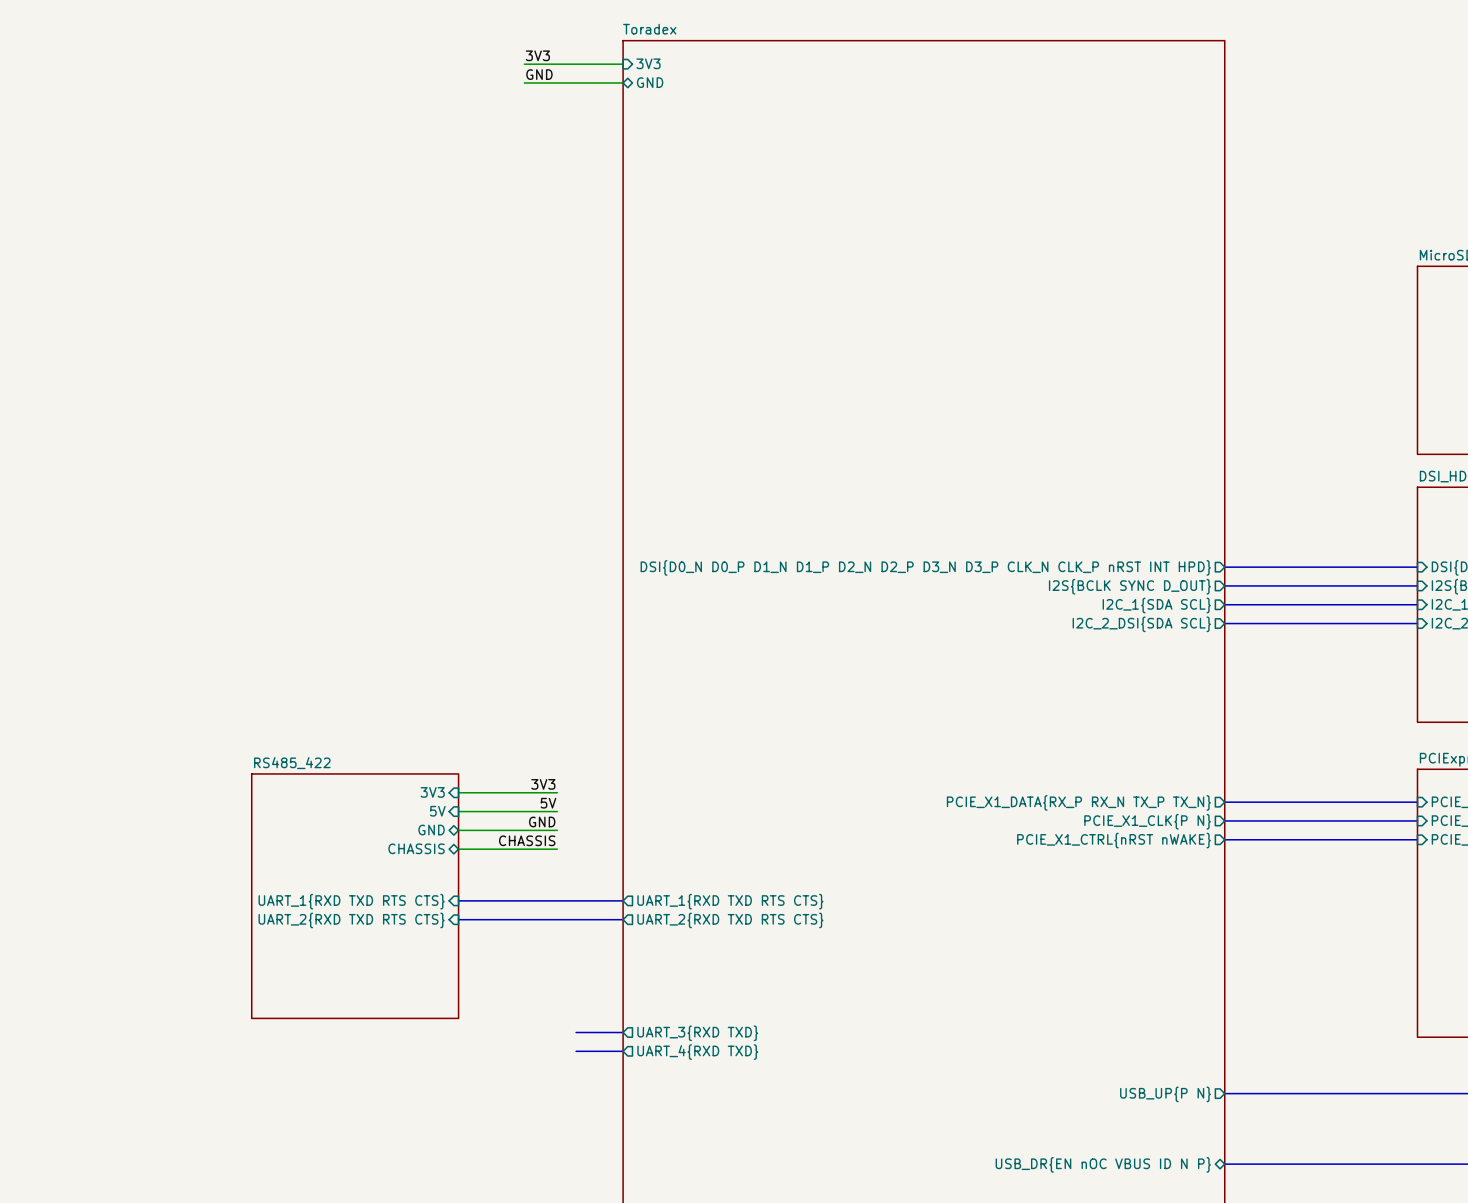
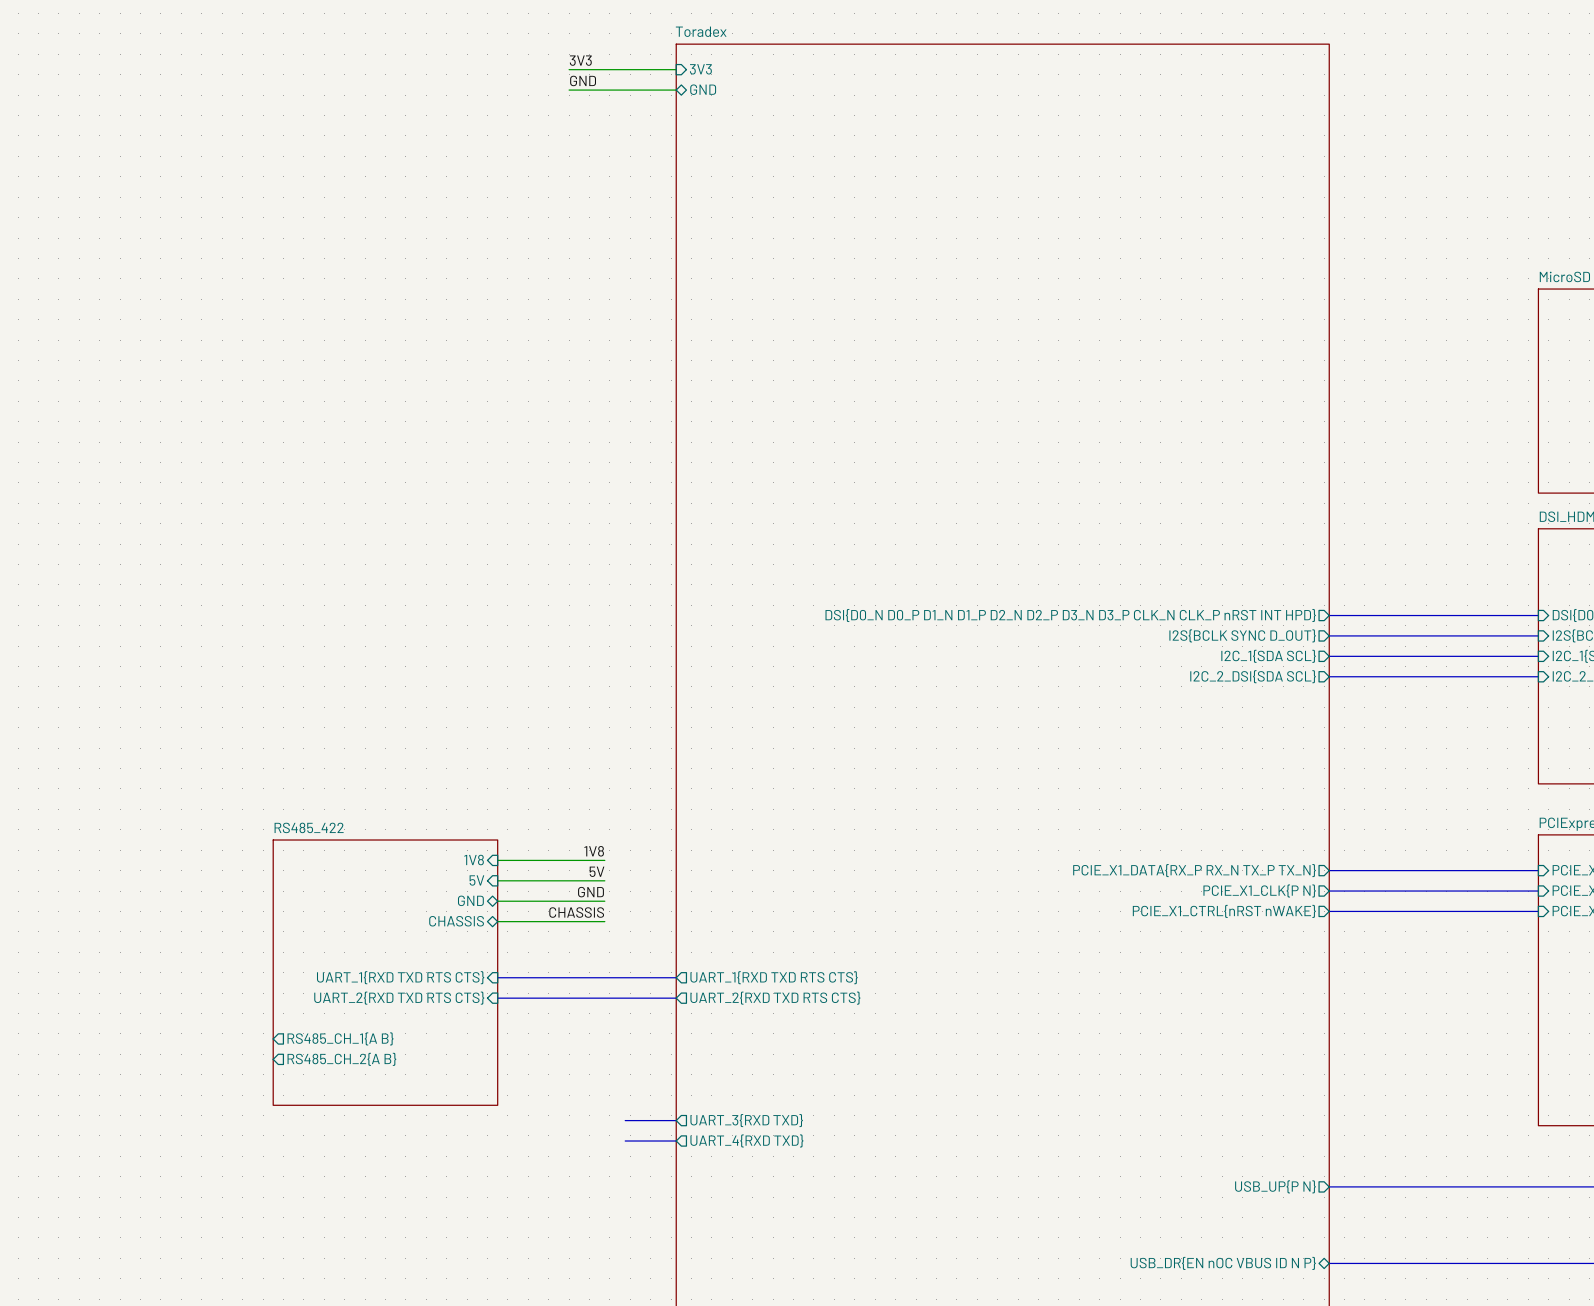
label: 3V3 (543, 784) -> 1V8 (594, 851)
sheet pin: 3V3 (432, 792) -> 1V8 (474, 860)
sheet pin: none -> RS485_CH_1{A B} (340, 1038)
sheet pin: none -> RS485_CH_2{A B} (341, 1059)

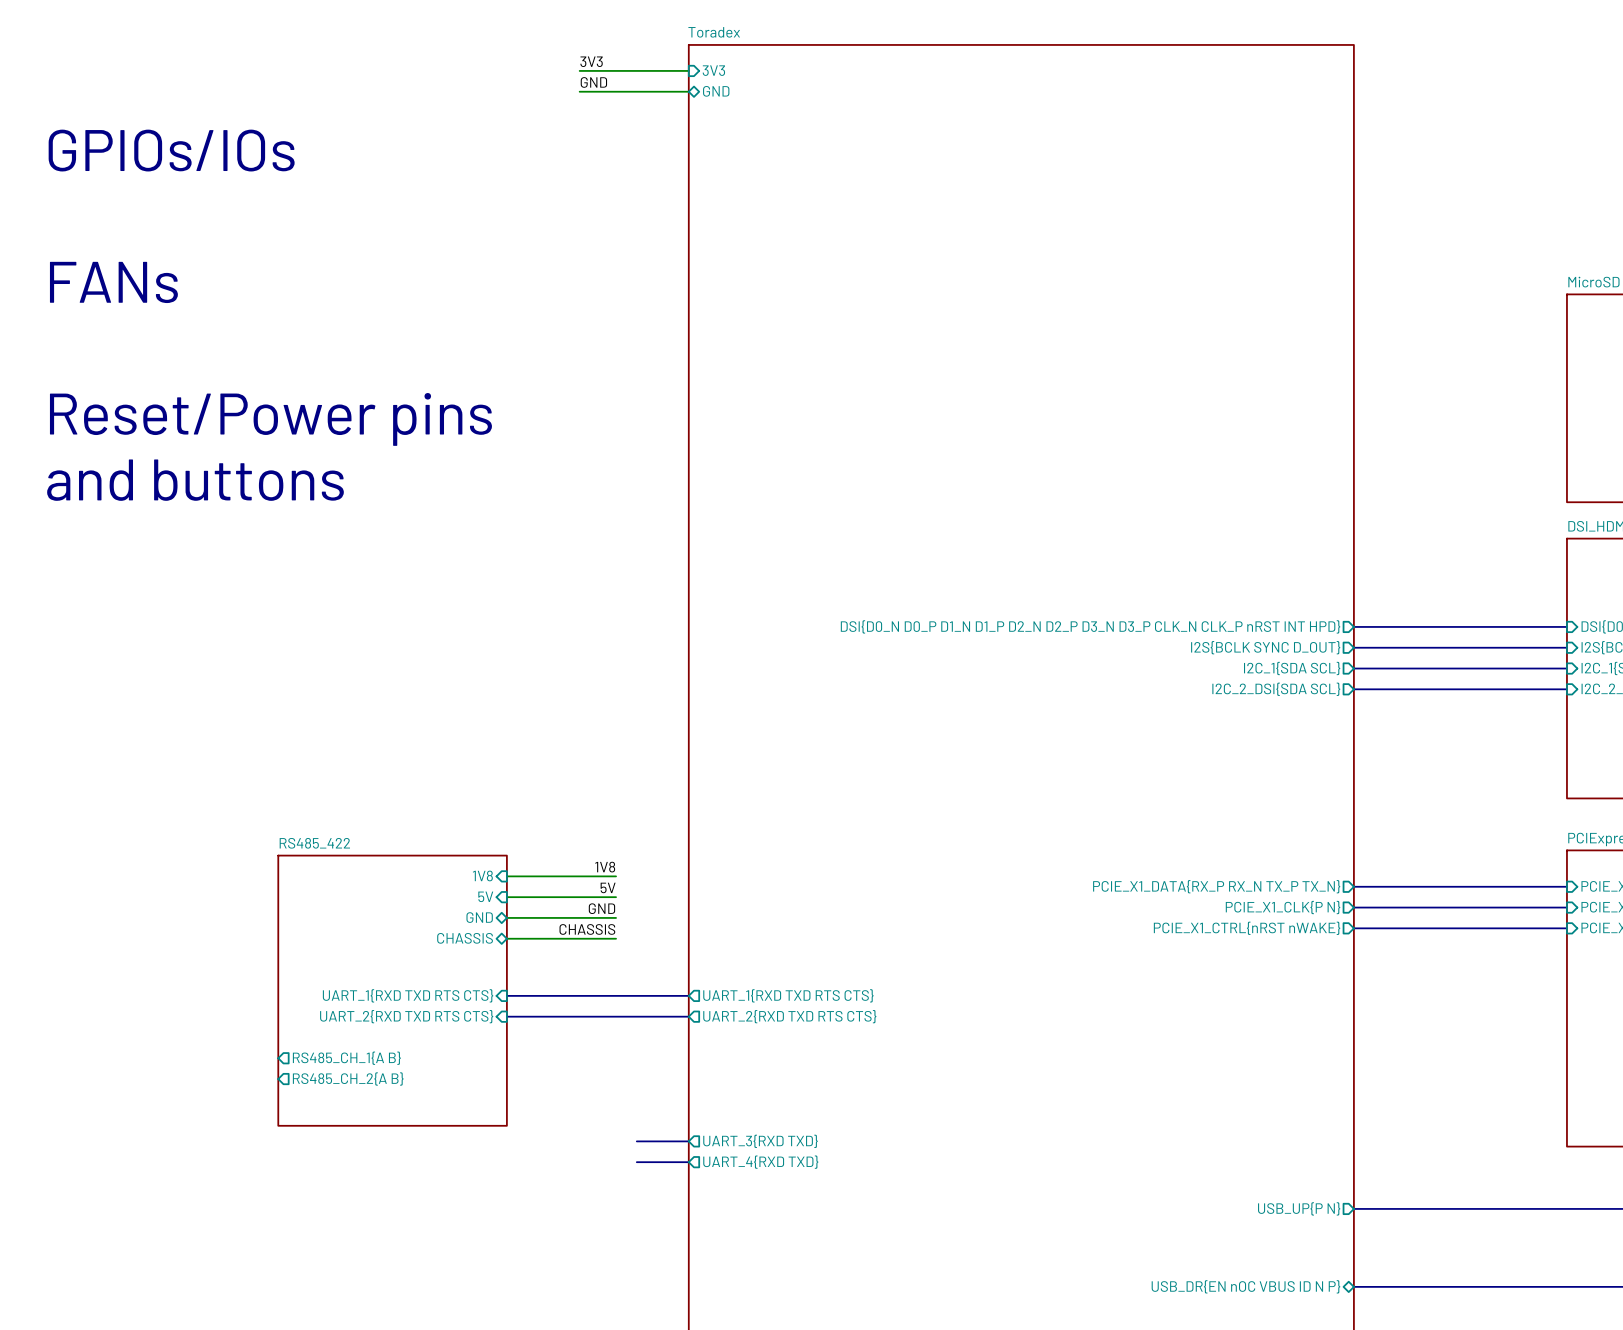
text: none -> GPIOs/IOs (171, 150)
text: none -> FANs (113, 282)
text: none -> Reset/Power pins (270, 419)
text: none -> and buttons (195, 480)

